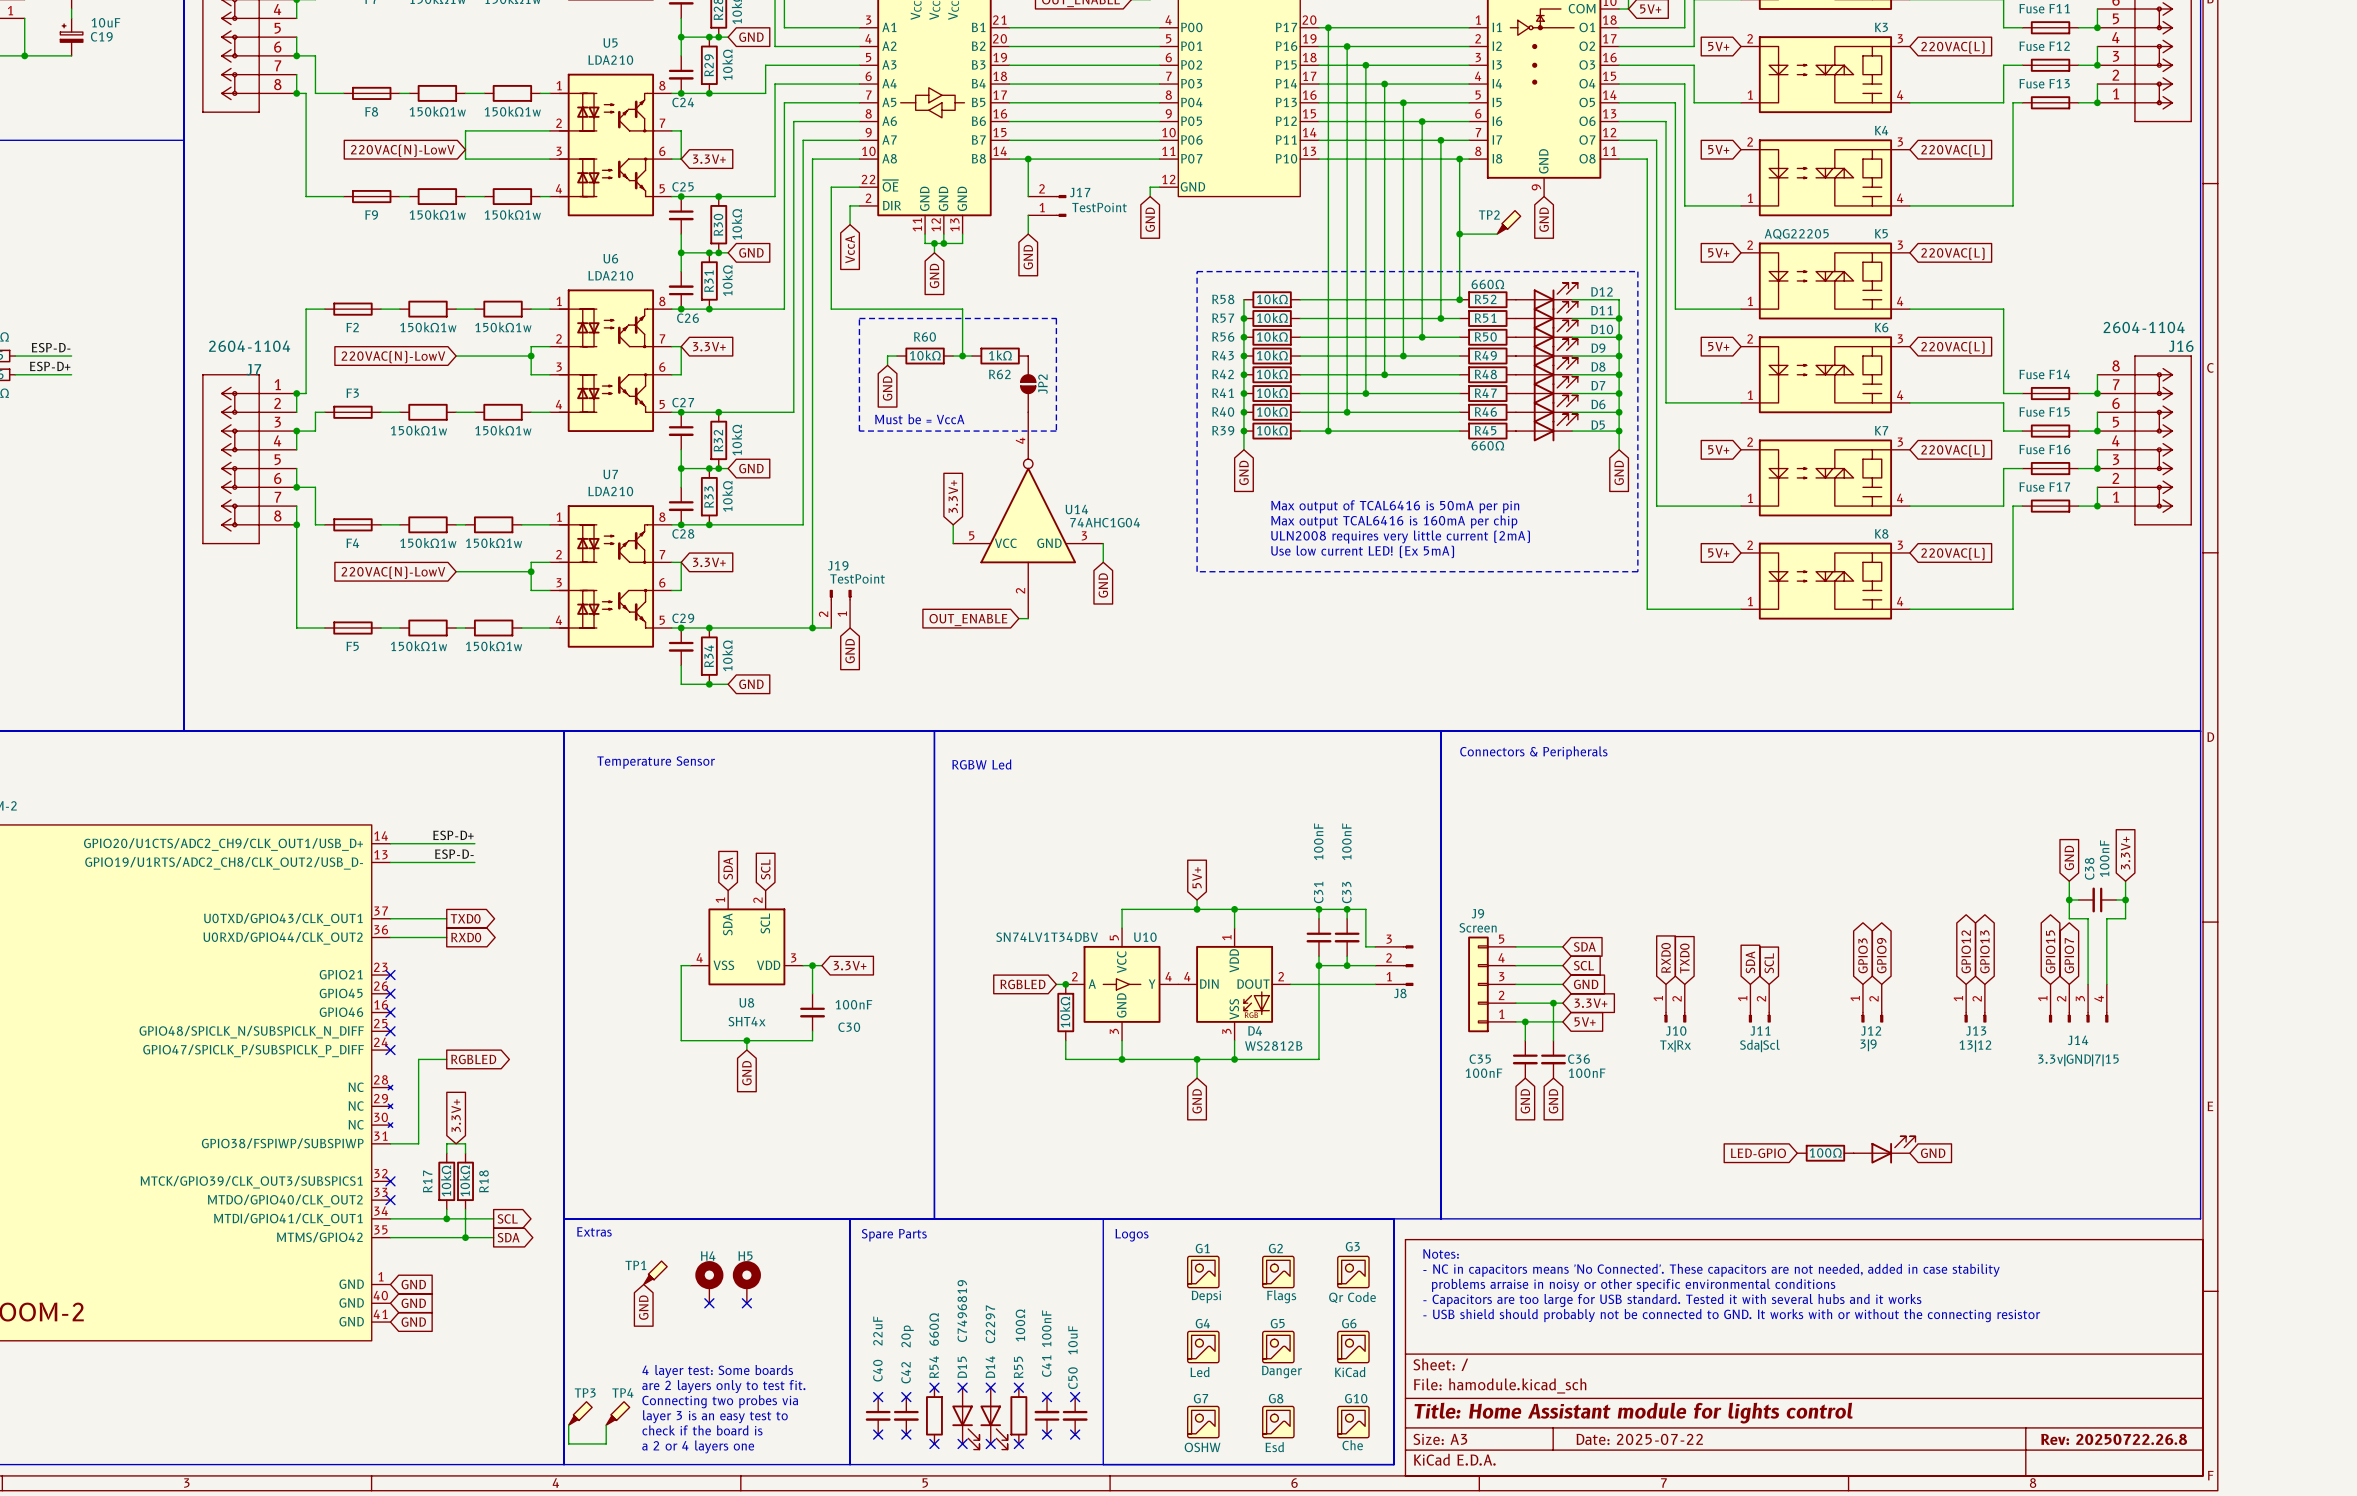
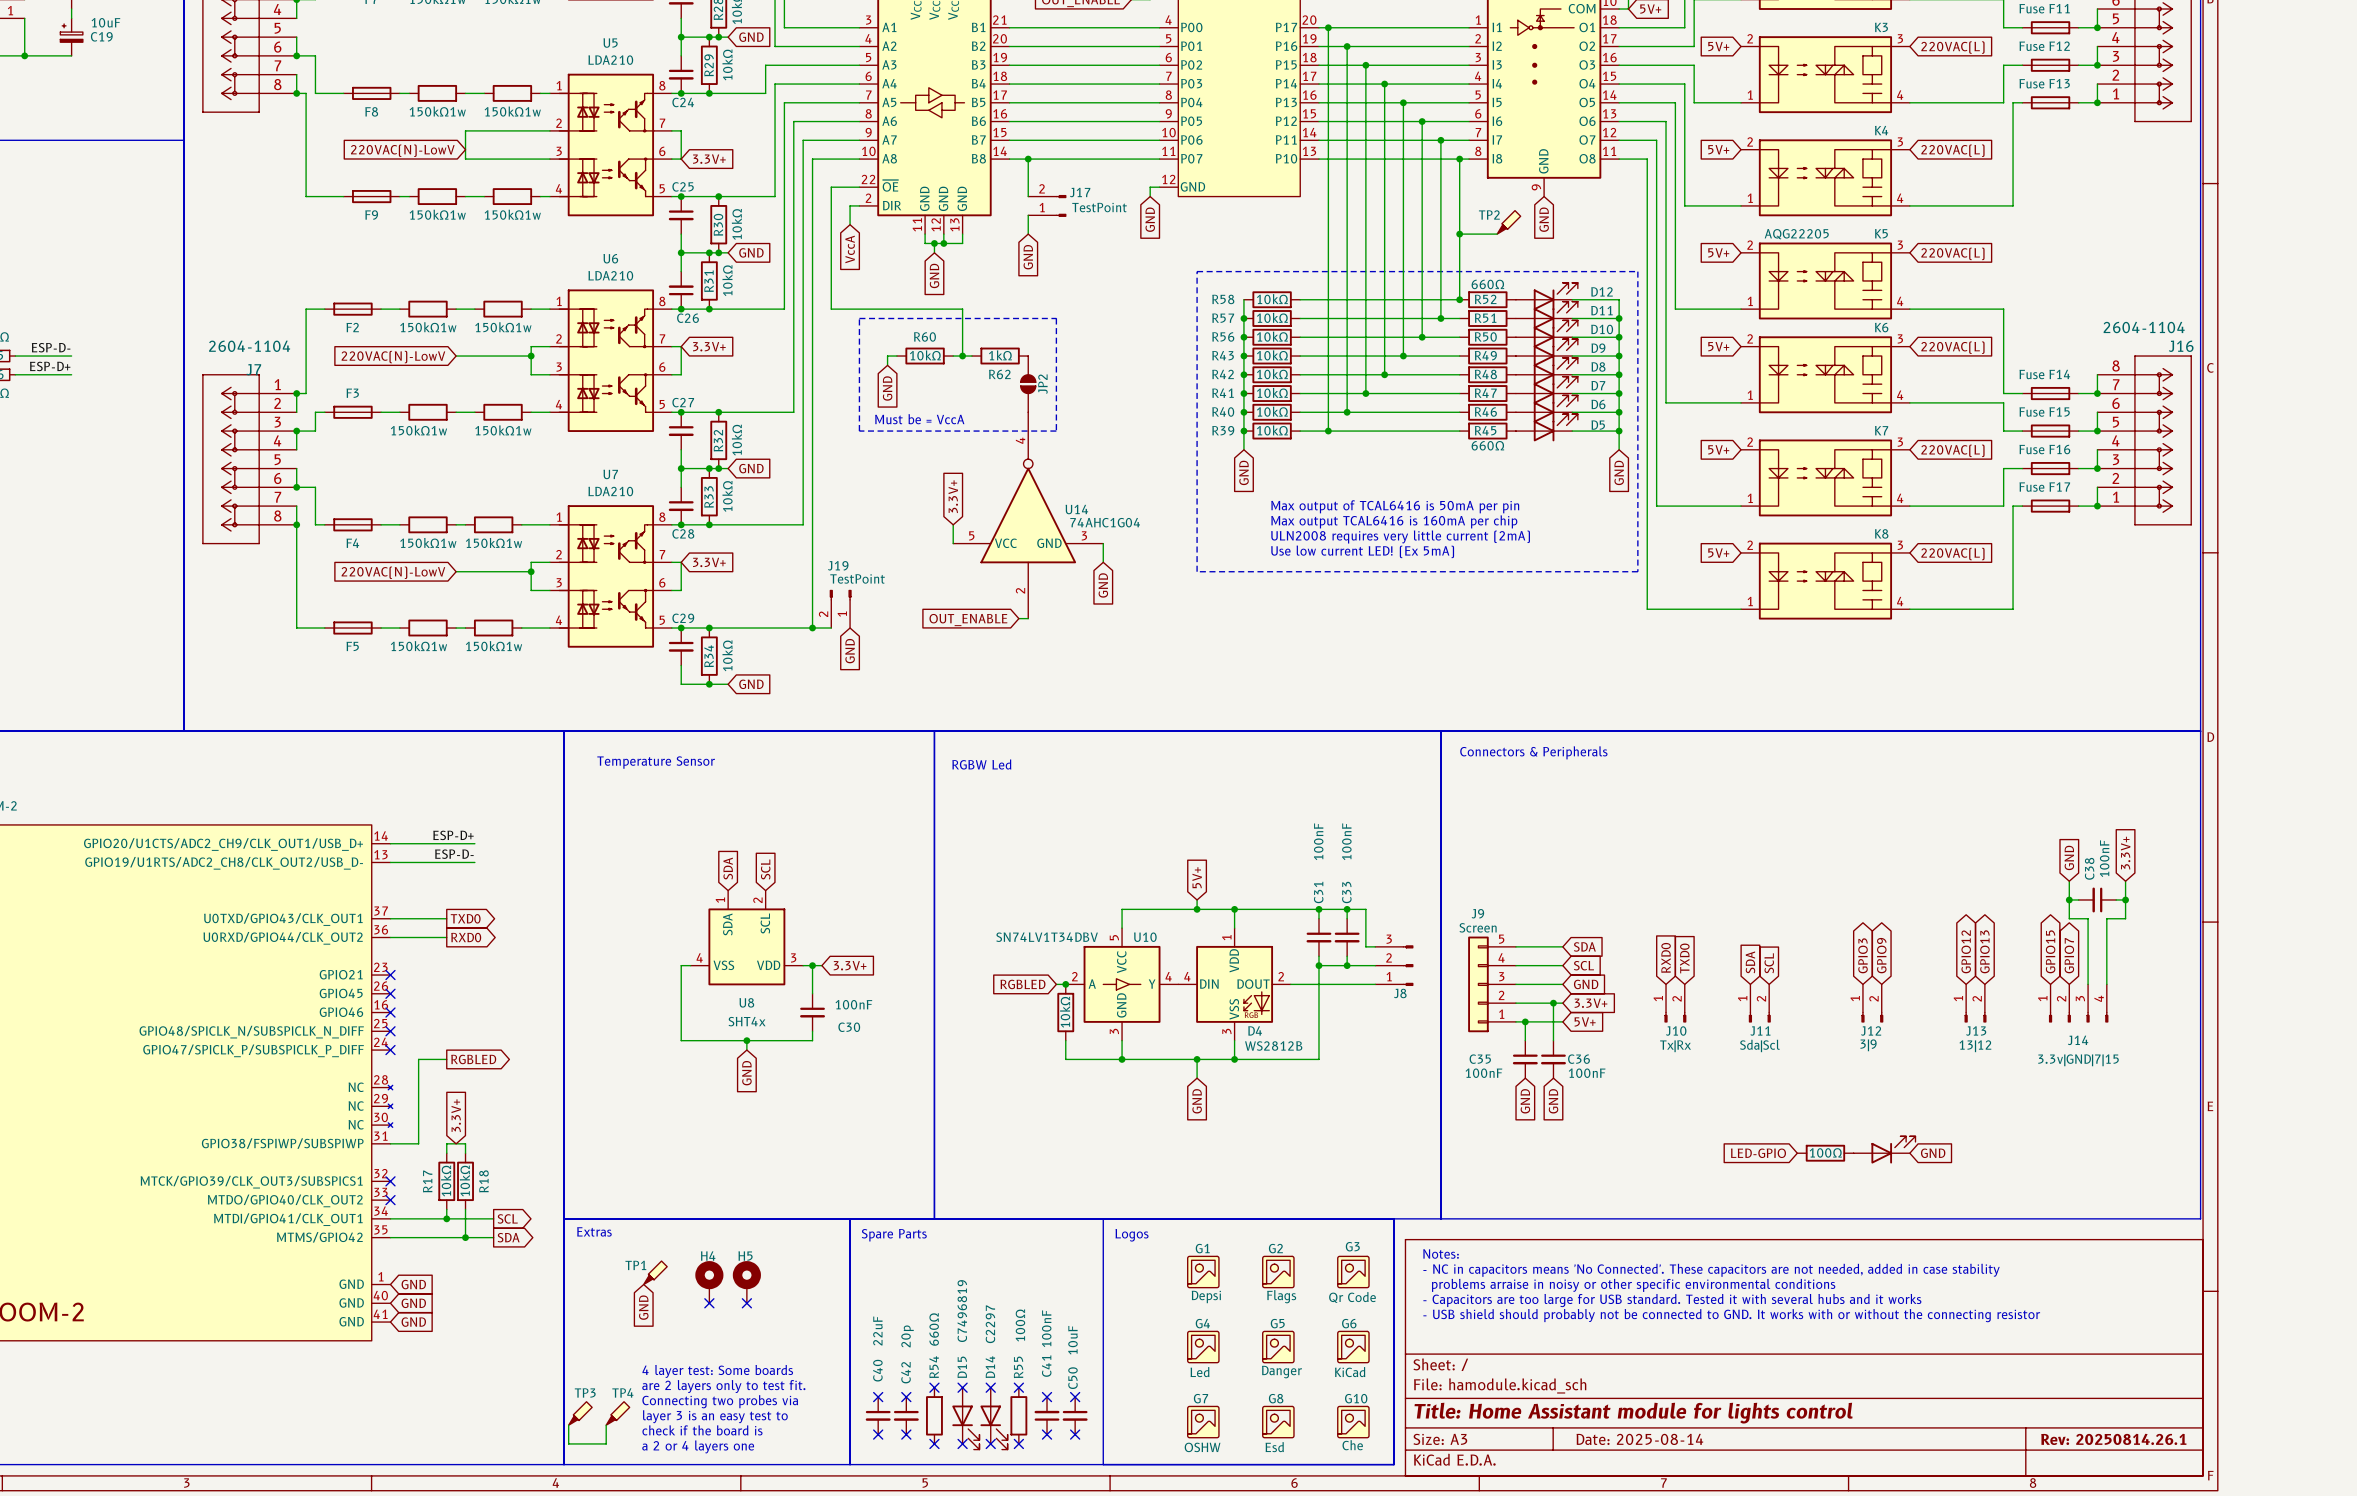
title block: Date: 2025-07-22 (1639, 1439) -> Date: 2025-08-14 (1639, 1439)
title block: Rev: 20250722.26.8 (2114, 1439) -> Rev: 20250814.26.1 (2113, 1439)

